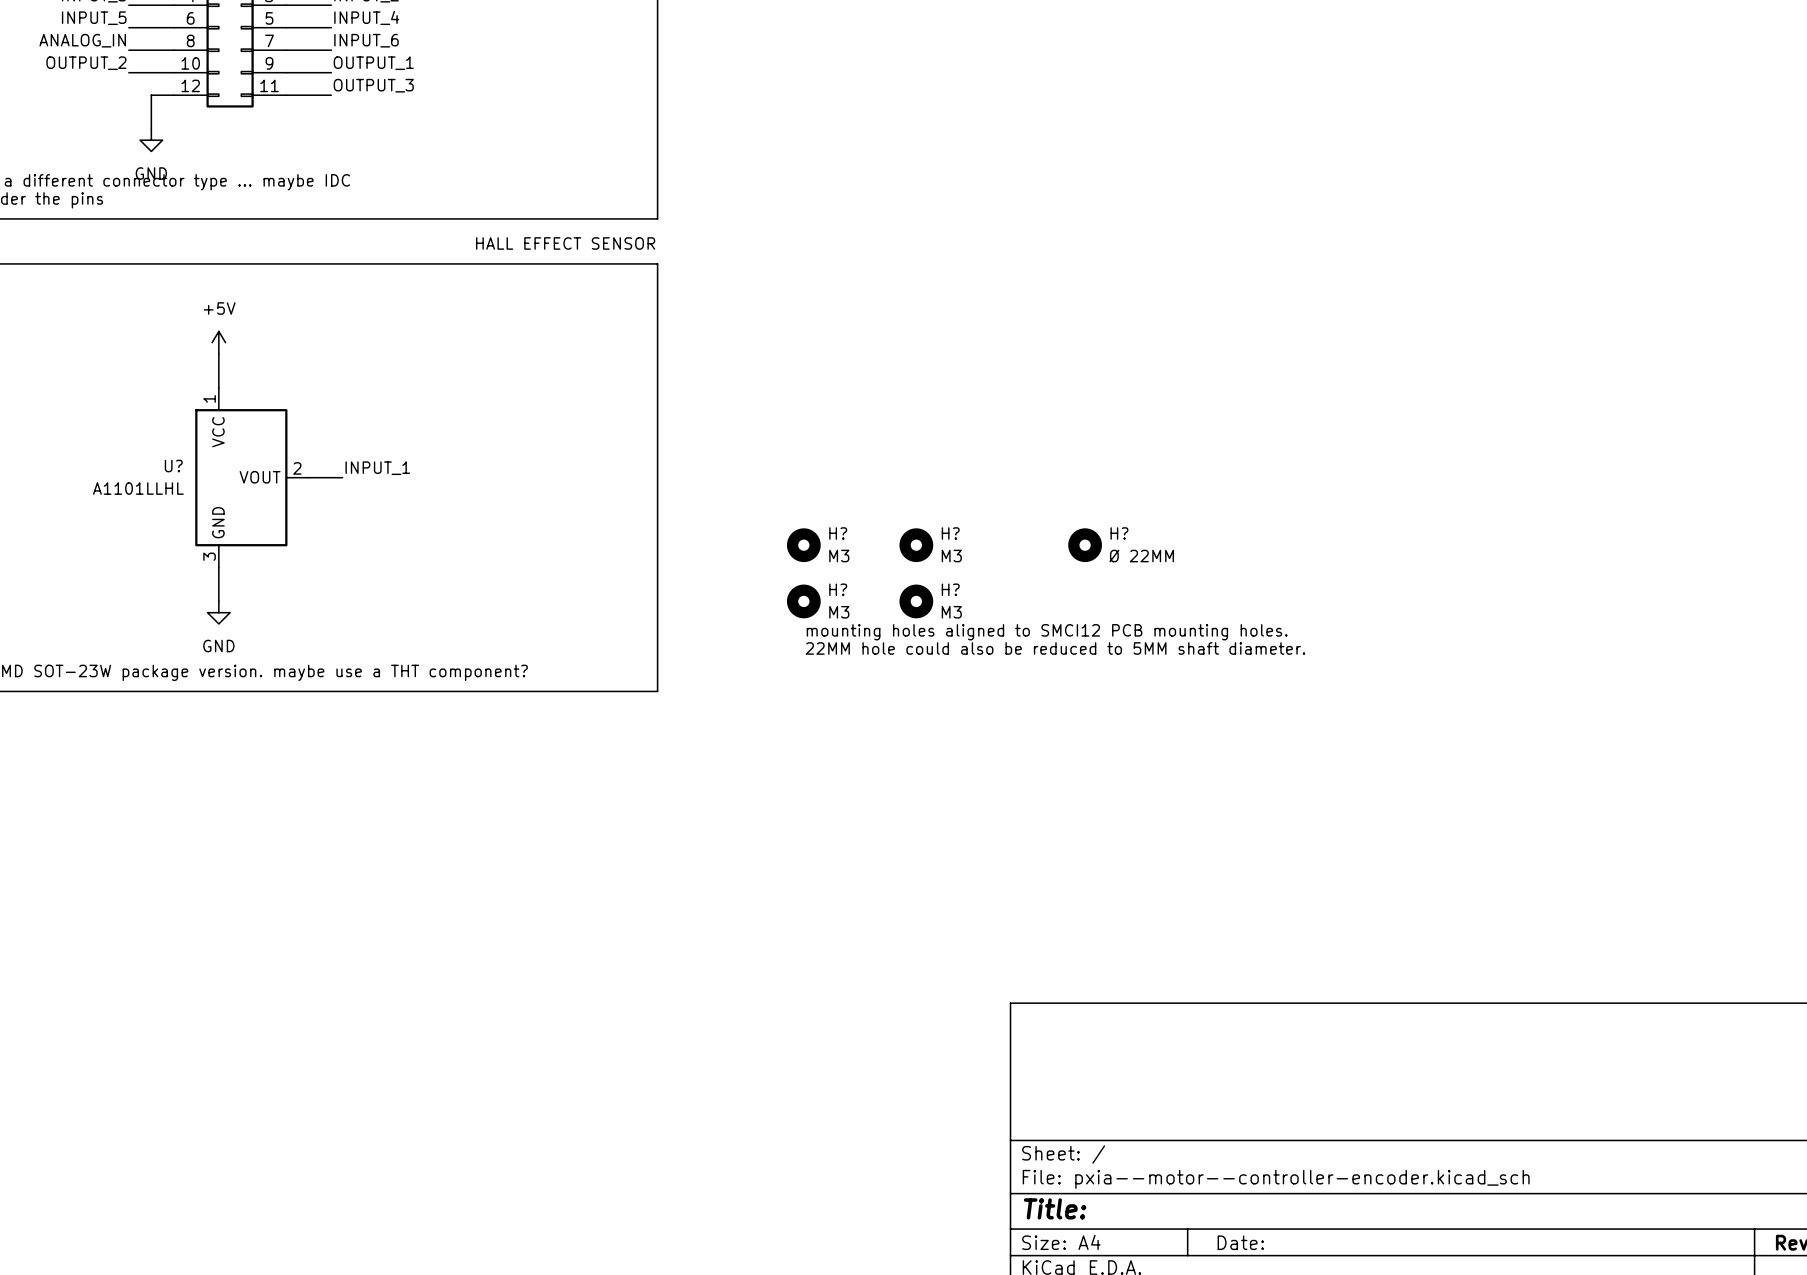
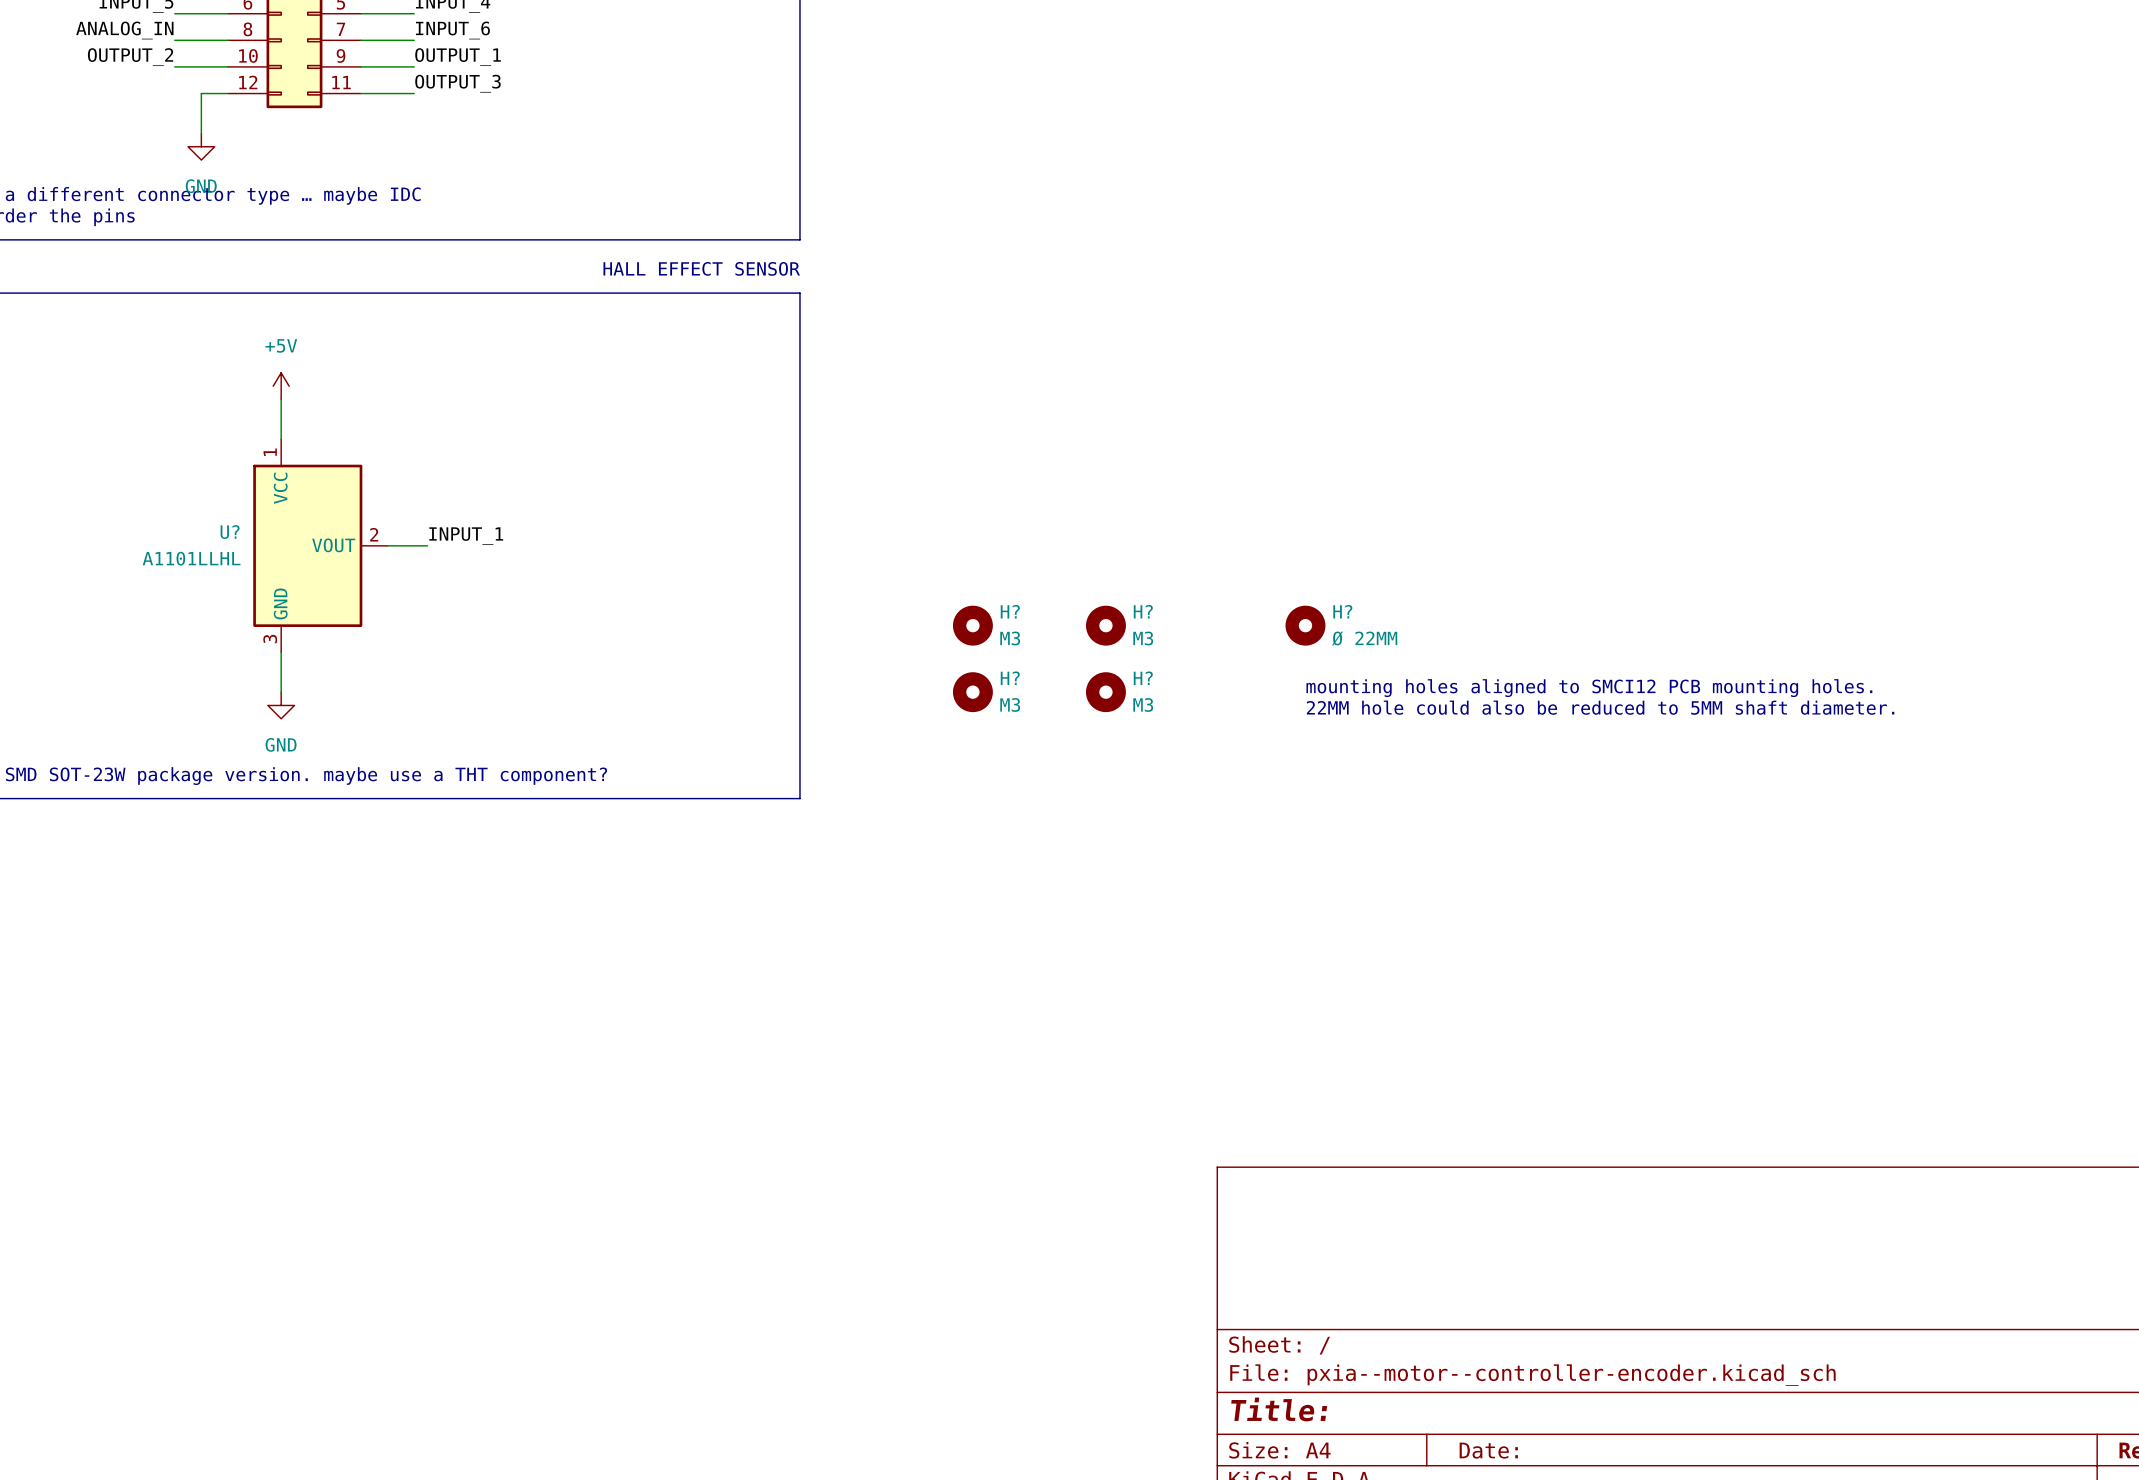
text: none -> mounting holes aligned to SMCI12 PCB mounting holes. (1589, 688)
text: none -> 22MM hole could also be reduced to 5MM shaft diameter. (1600, 707)
text: mounting holes aligned to SMCI12 PCB mounting holes. (1047, 632) -> none
text: 22MM hole could also be reduced to 5MM shaft diameter. (1055, 648) -> none

